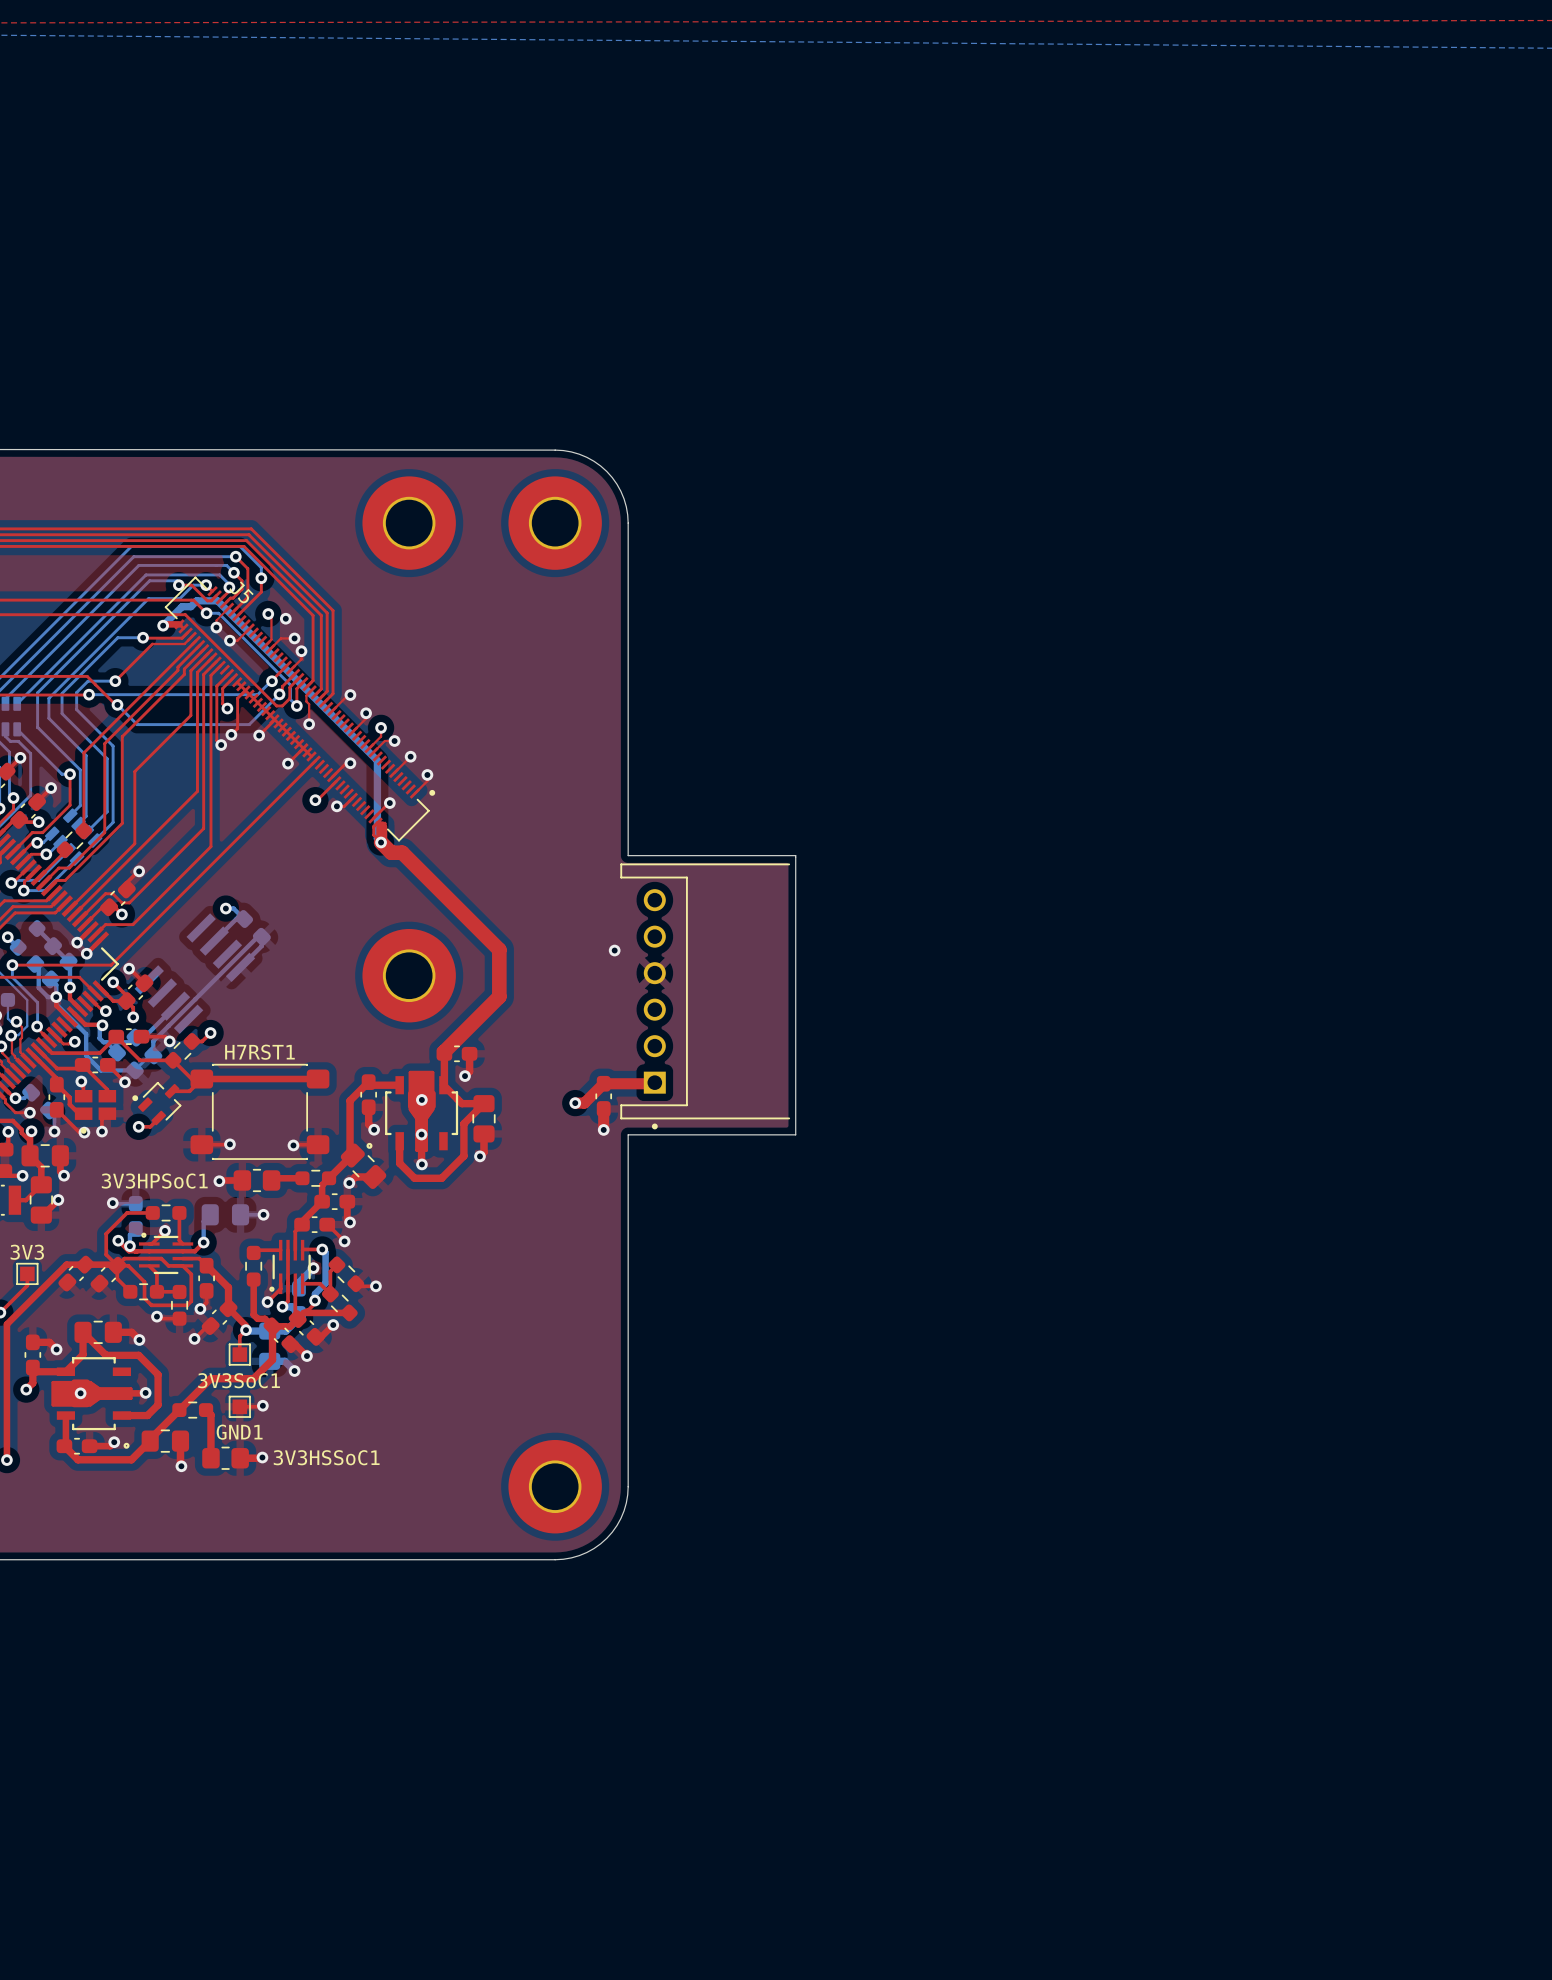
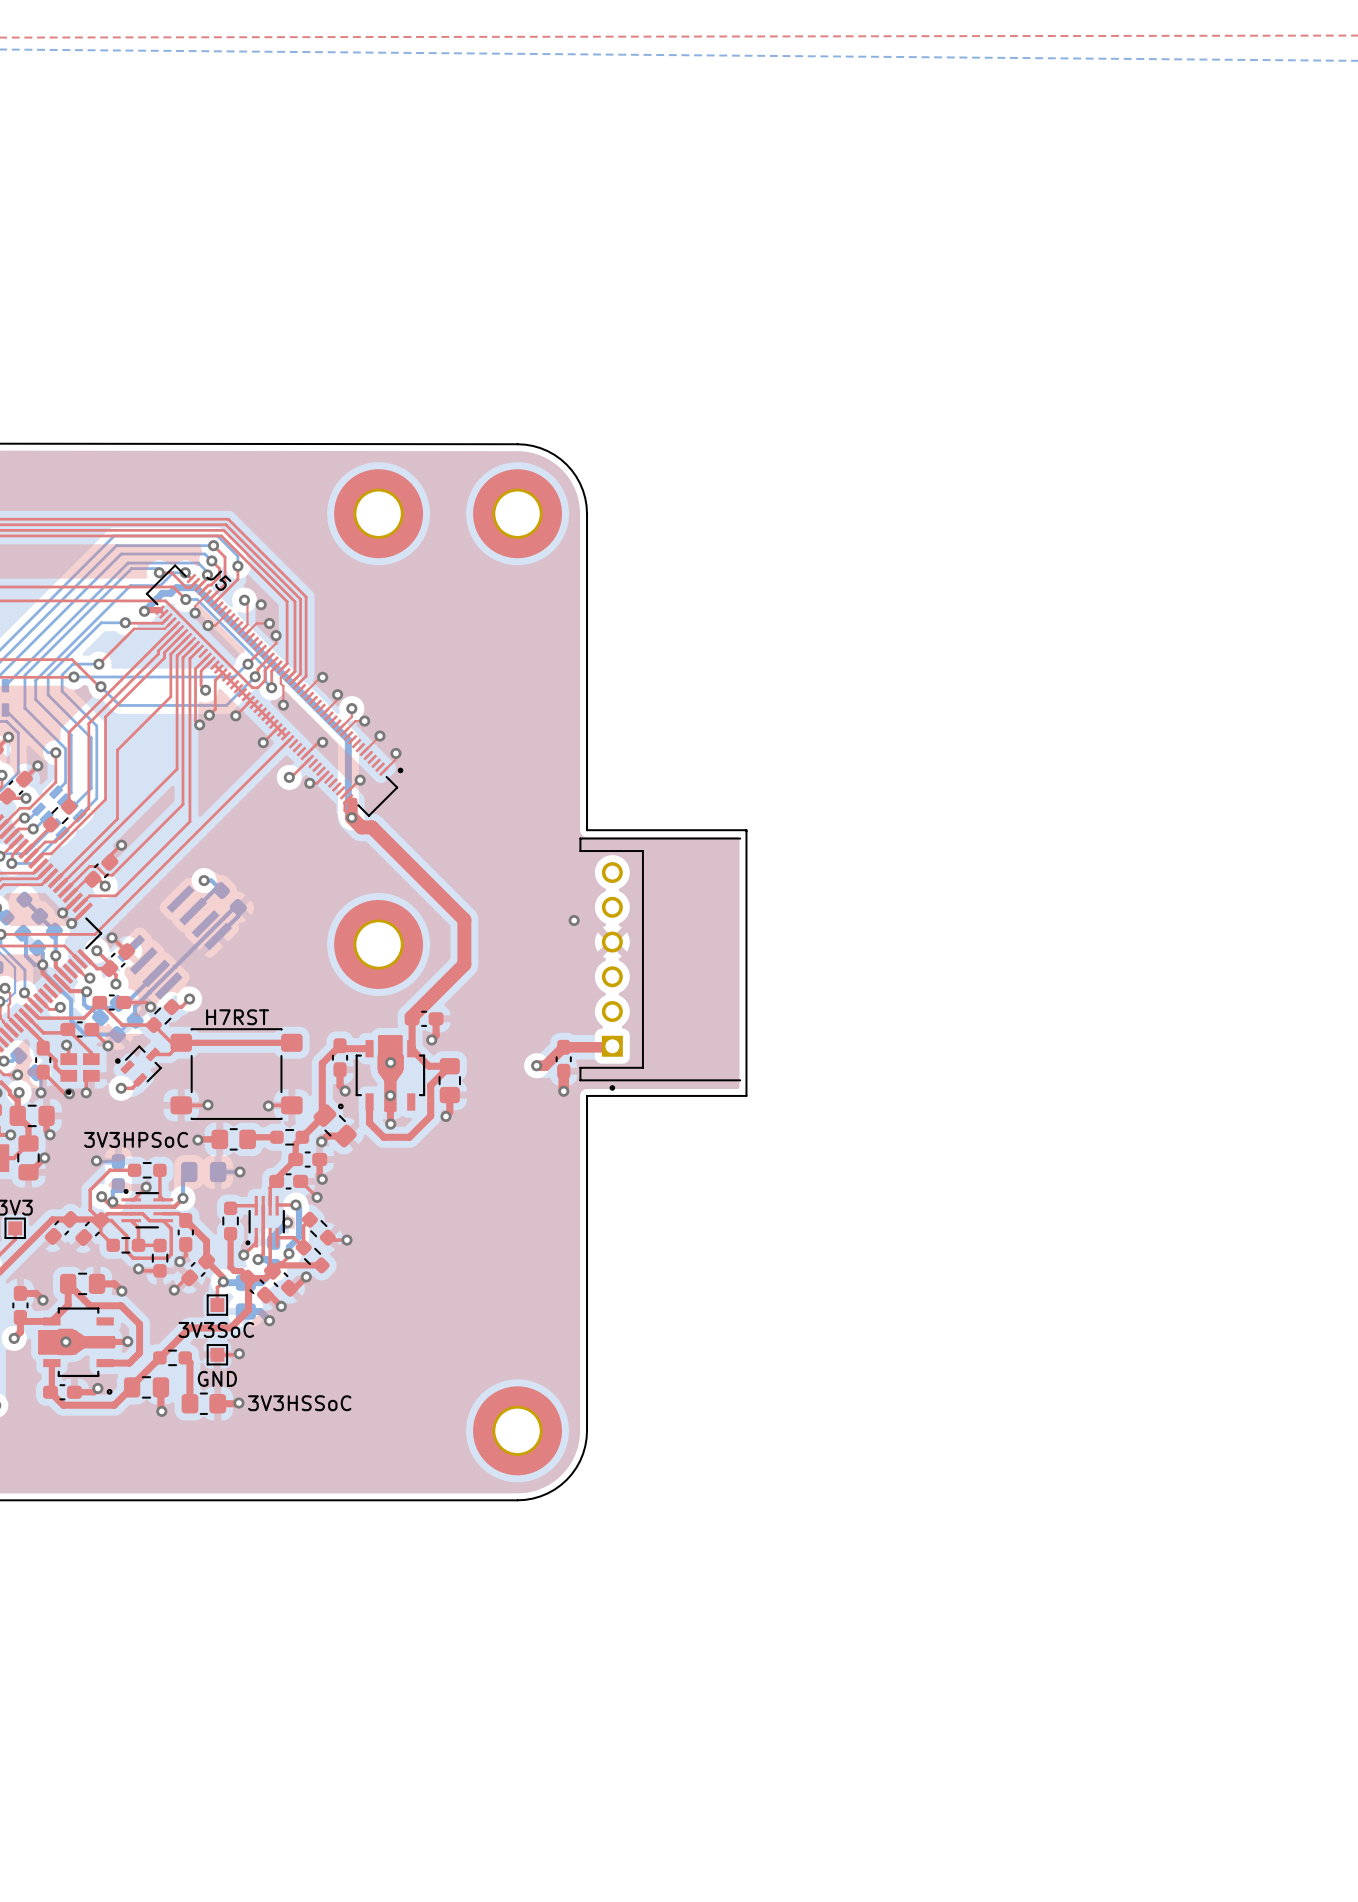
H7RST1 name: H7RST1 (259, 1052) -> H7RST (237, 1017)
3V3HPSoC1 name: 3V3HPSoC1 (154, 1181) -> 3V3HPSoC (136, 1139)
3V3SoC1 name: 3V3SoC1 (239, 1380) -> 3V3SoC (216, 1329)
GND1 name: GND1 (239, 1432) -> GND (217, 1378)
3V3HSSoC1 name: 3V3HSSoC1 (326, 1457) -> 3V3HSSoC (299, 1403)

